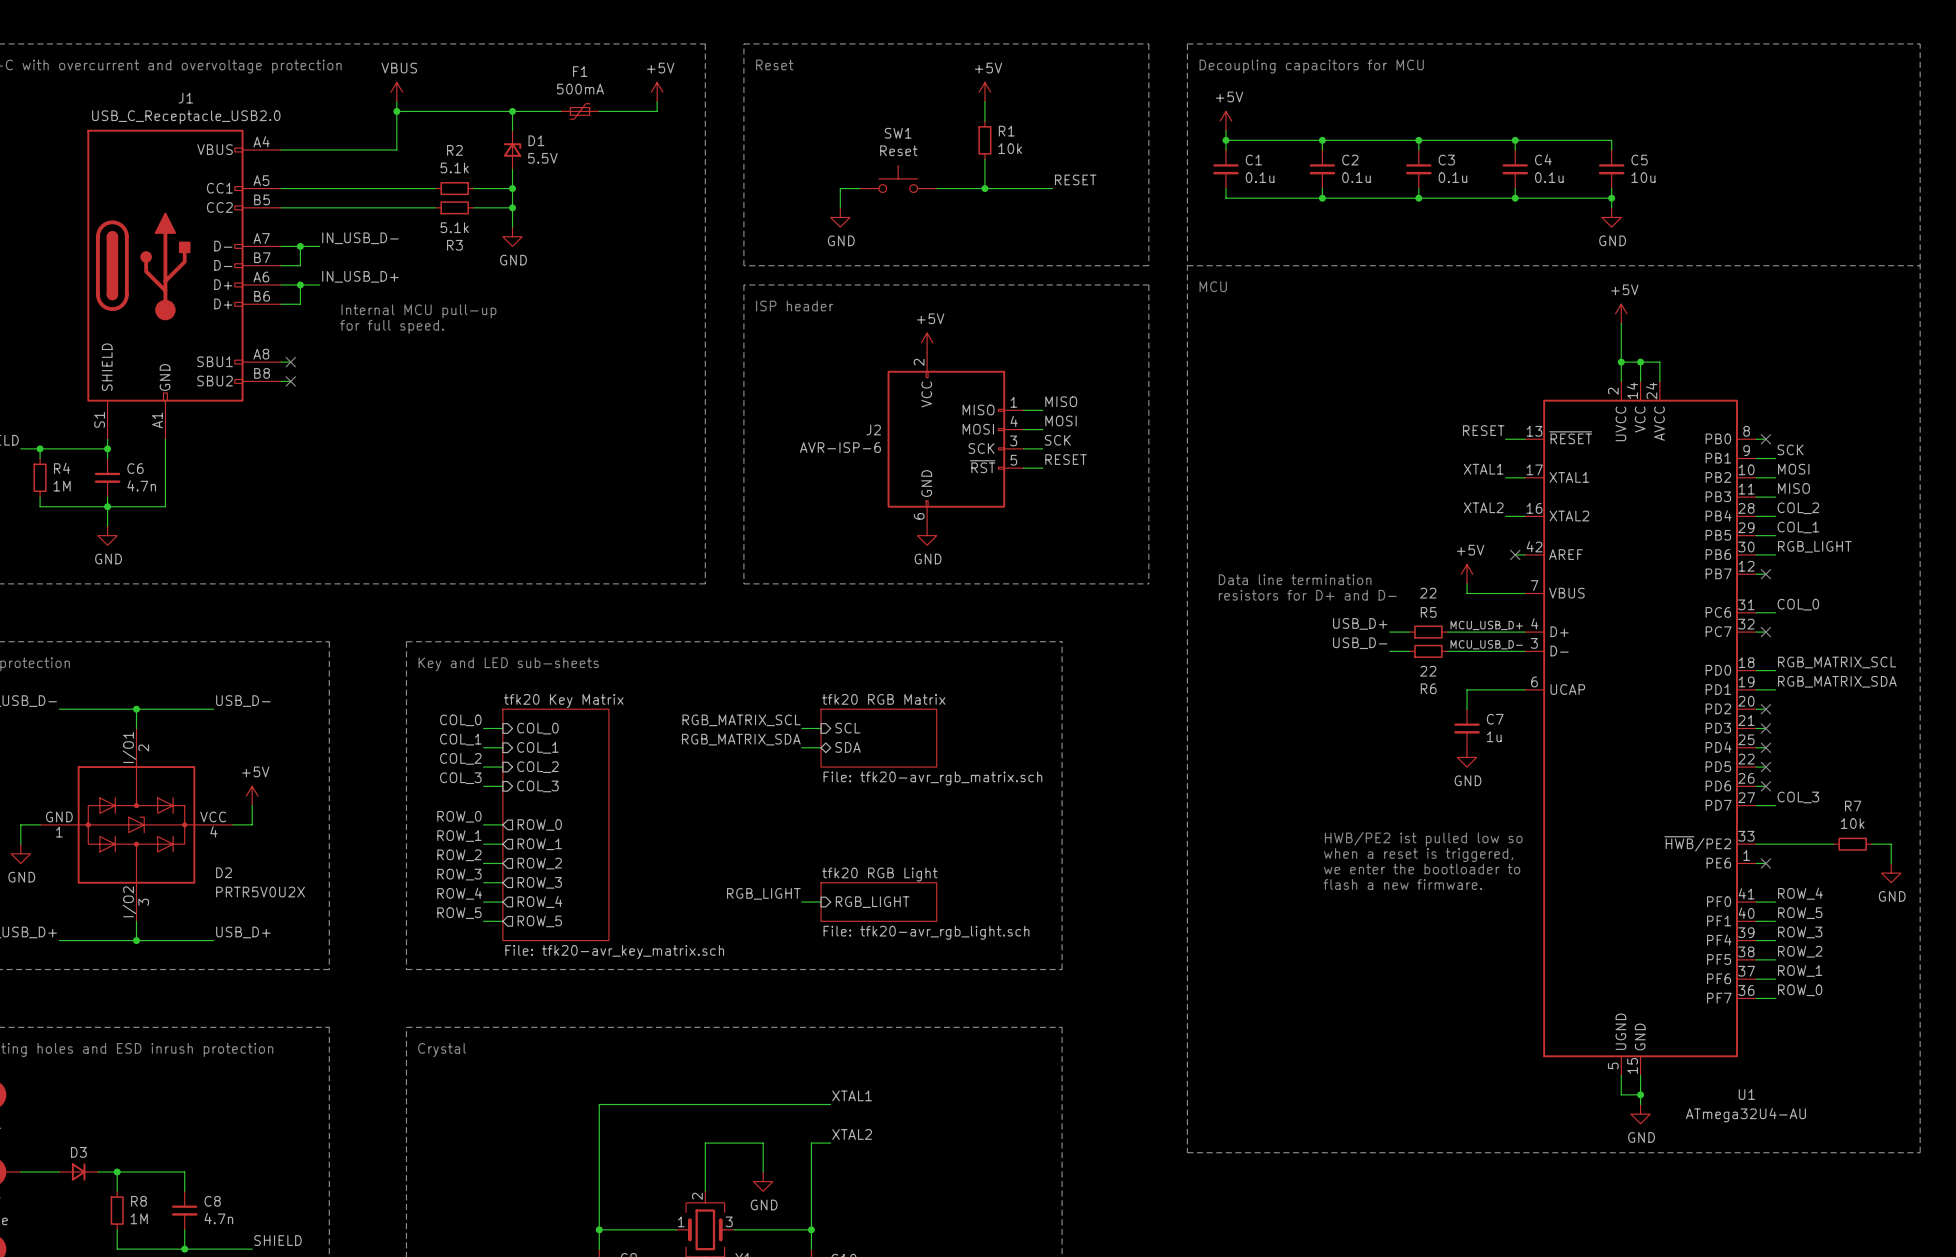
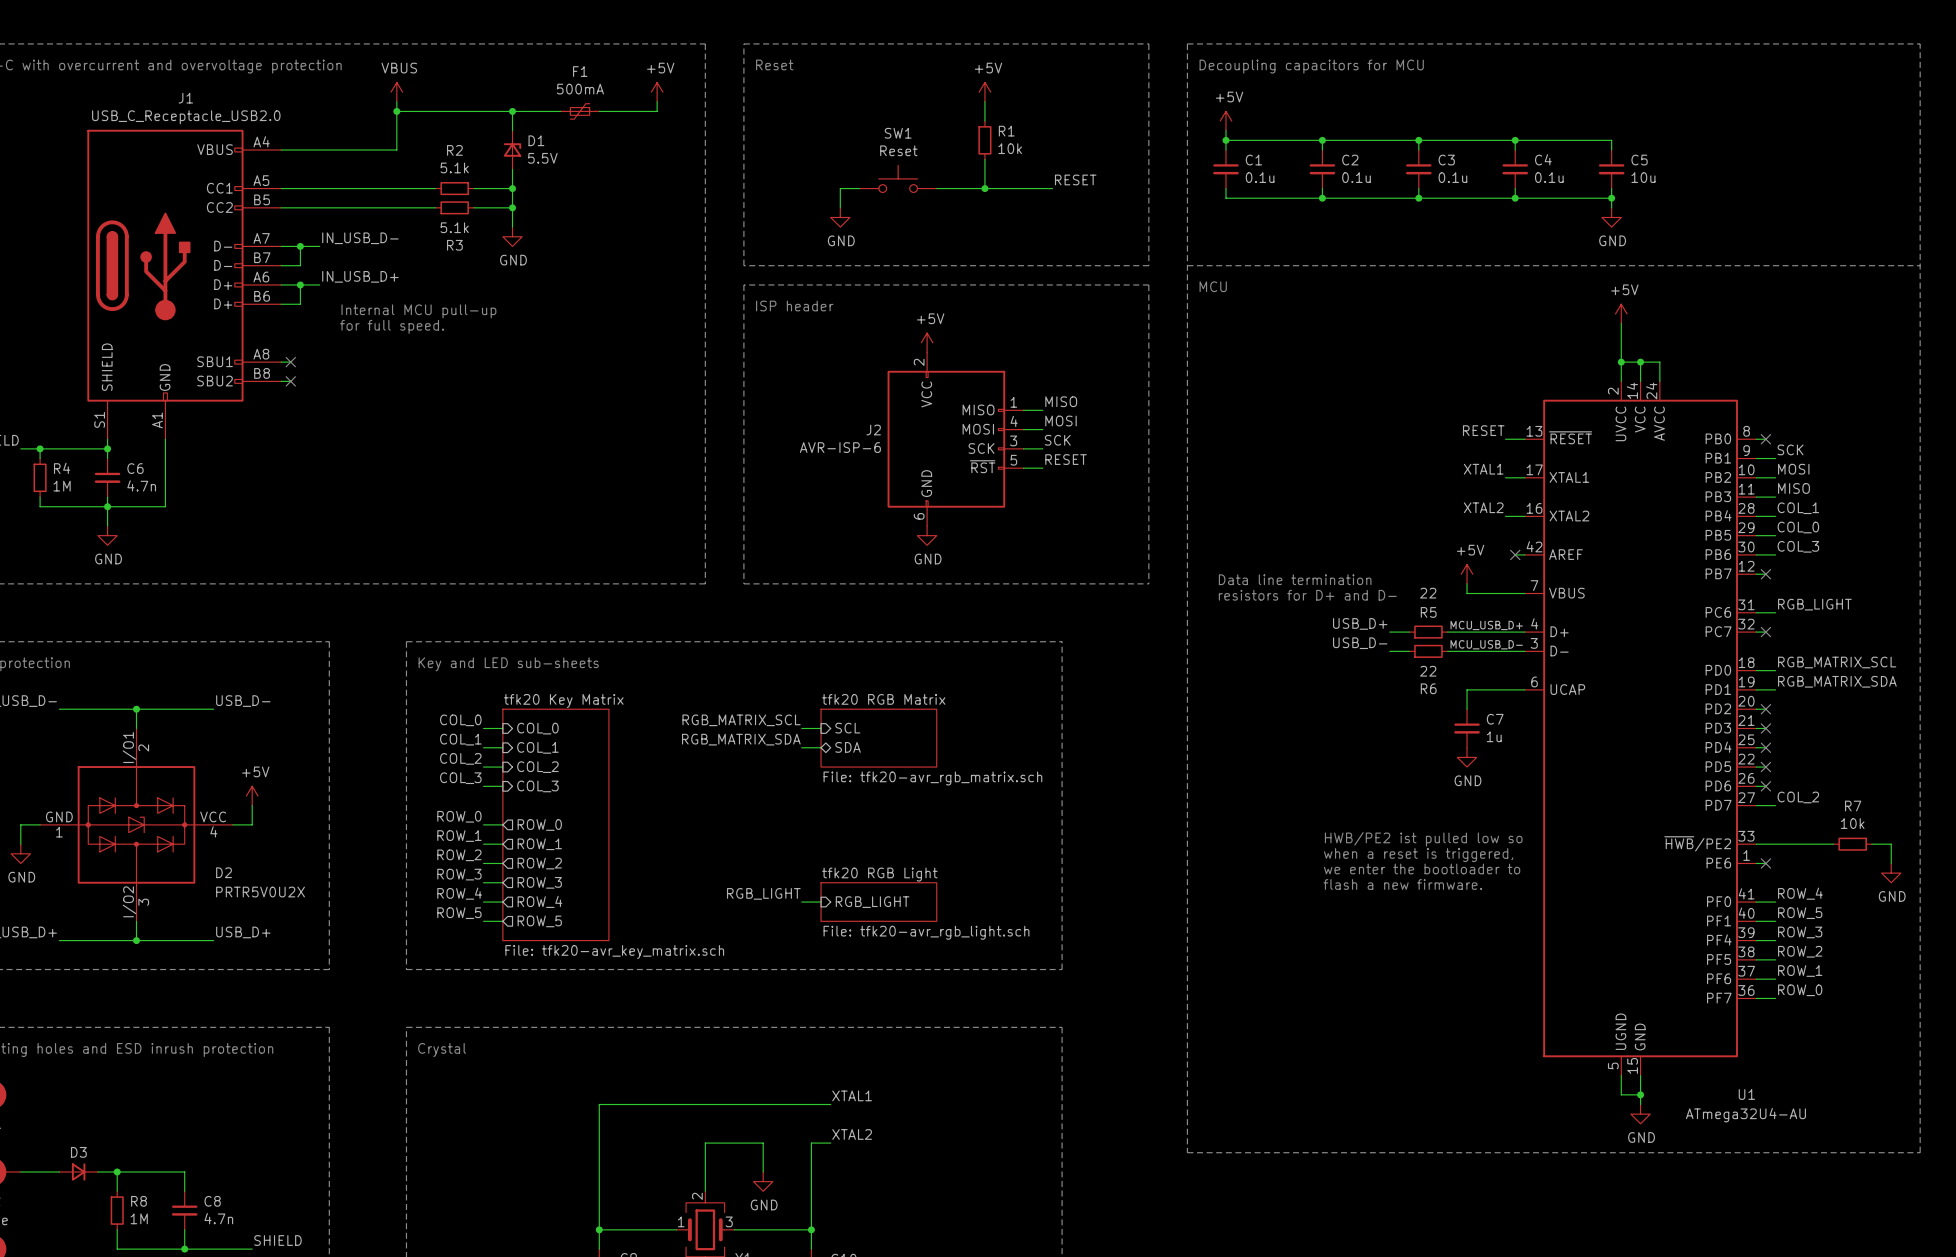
label: COL_2 (1798, 508) -> COL_1 (1798, 508)
label: COL_1 (1798, 527) -> COL_0 (1798, 527)
label: RGB_LIGHT (1814, 546) -> COL_3 (1798, 546)
label: COL_0 (1798, 604) -> RGB_LIGHT (1814, 604)
label: COL_3 (1798, 797) -> COL_2 (1798, 797)

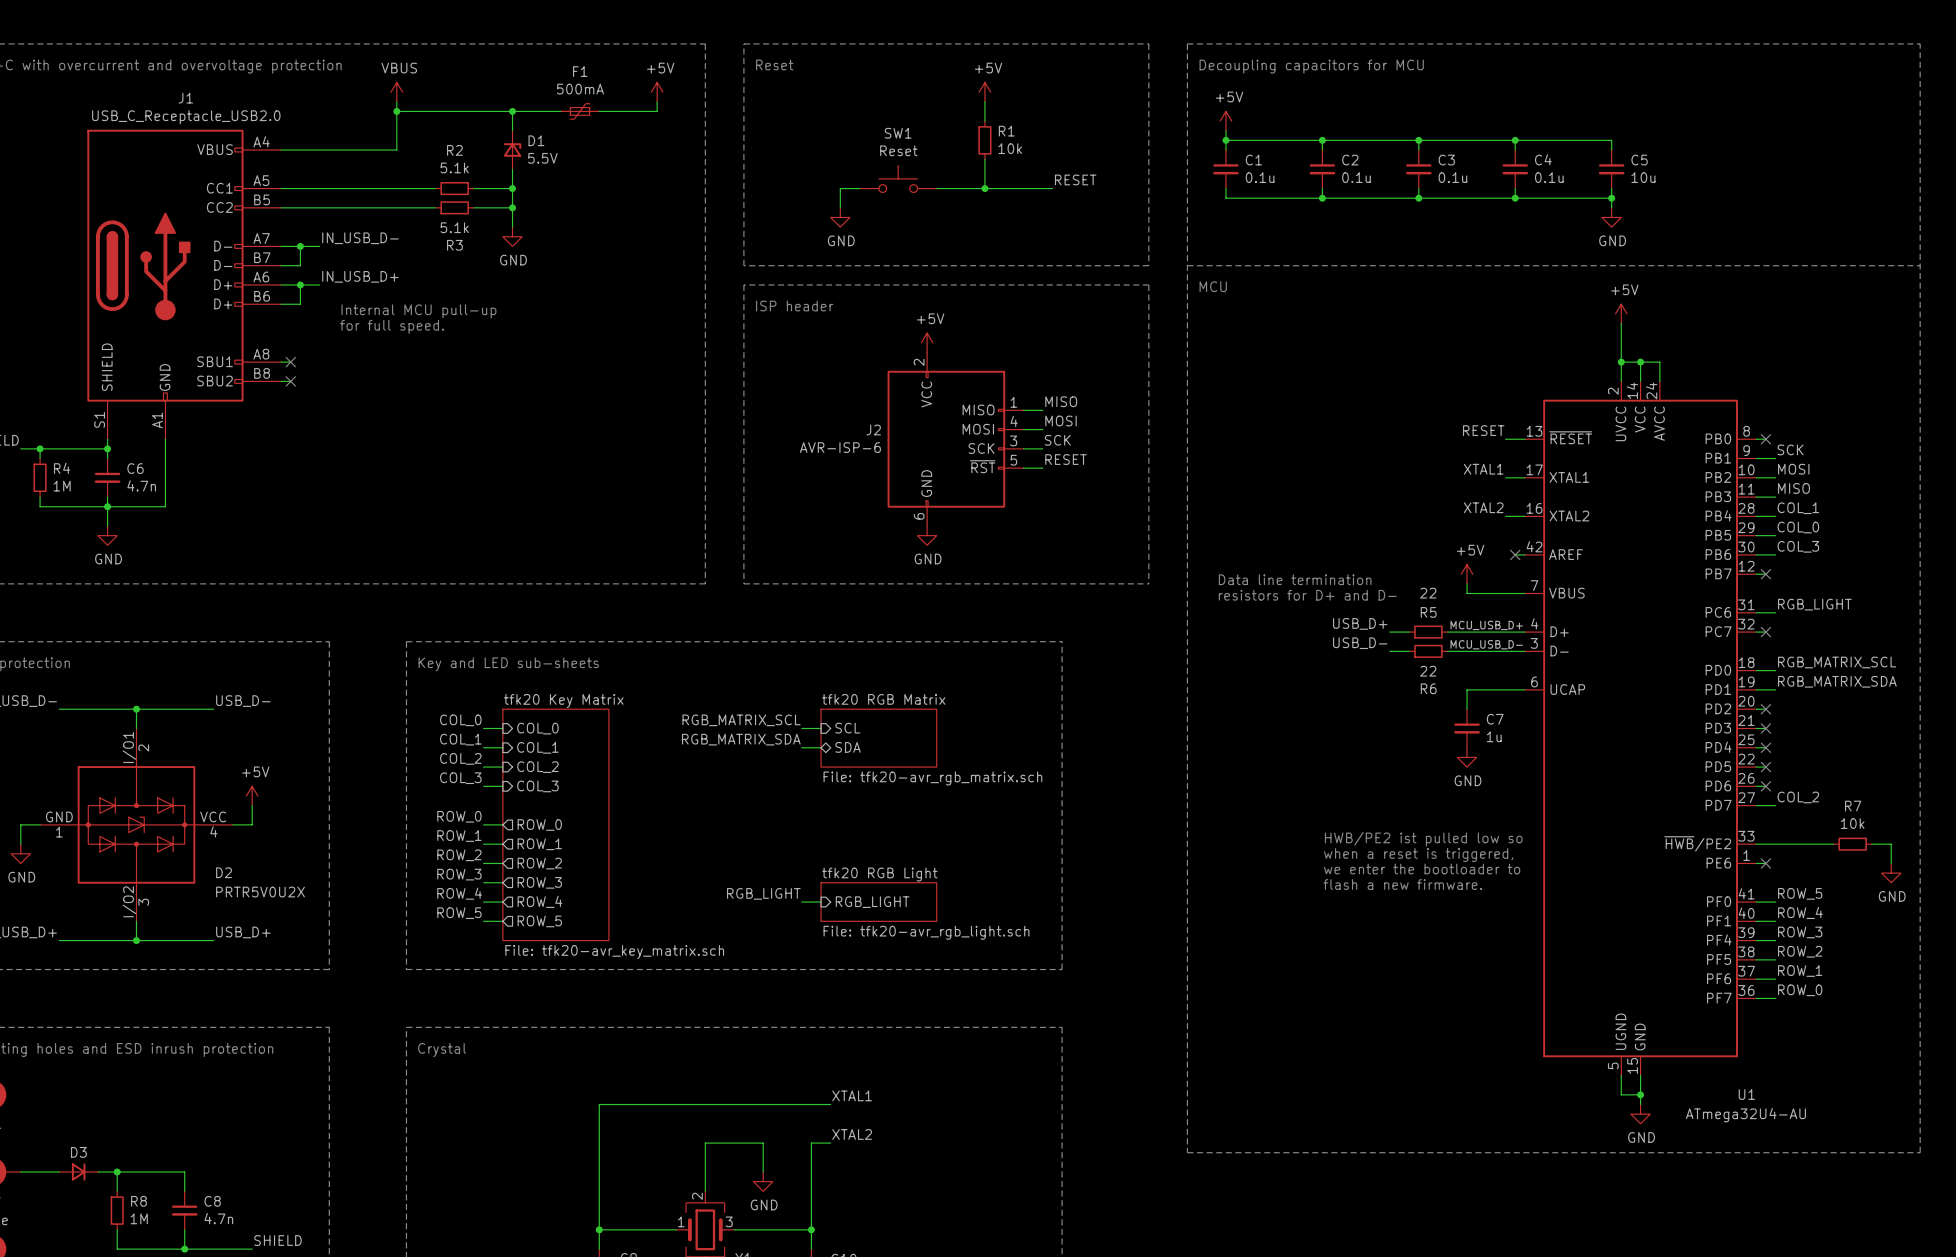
label: ROW_4 (1800, 893) -> ROW_5 (1800, 893)
label: ROW_5 (1800, 913) -> ROW_4 (1800, 912)

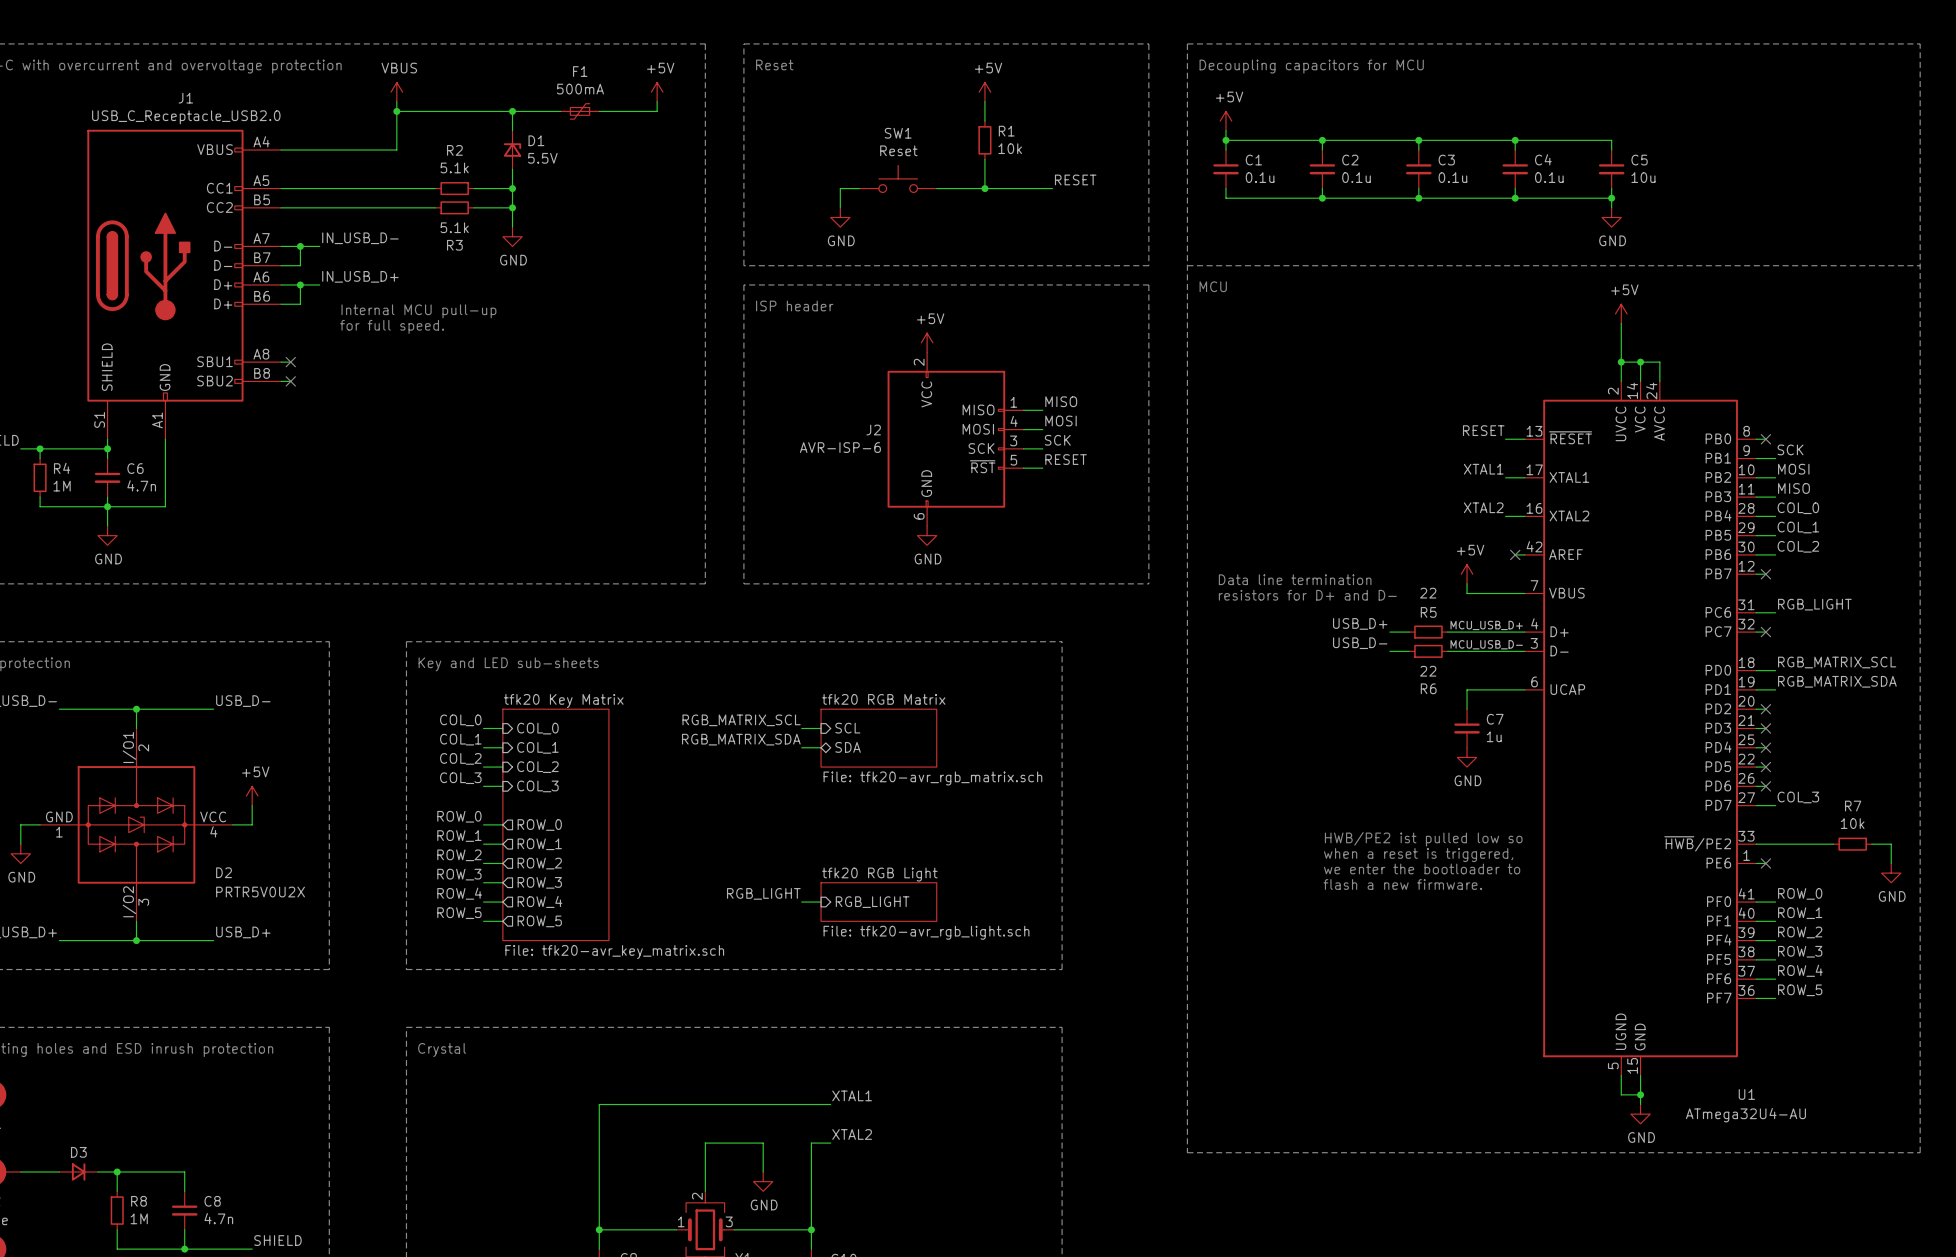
label: COL_1 (1798, 508) -> COL_0 (1798, 508)
label: COL_0 (1798, 527) -> COL_1 (1798, 527)
label: COL_3 (1798, 546) -> COL_2 (1798, 546)
label: COL_2 (1798, 797) -> COL_3 (1798, 797)
label: ROW_5 (1800, 893) -> ROW_0 (1800, 893)
label: ROW_4 (1800, 912) -> ROW_1 (1800, 913)
label: ROW_3 (1800, 932) -> ROW_2 (1800, 932)
label: ROW_2 (1800, 951) -> ROW_3 (1800, 951)
label: ROW_1 (1800, 971) -> ROW_4 (1800, 970)
label: ROW_0 (1800, 990) -> ROW_5 (1800, 990)

